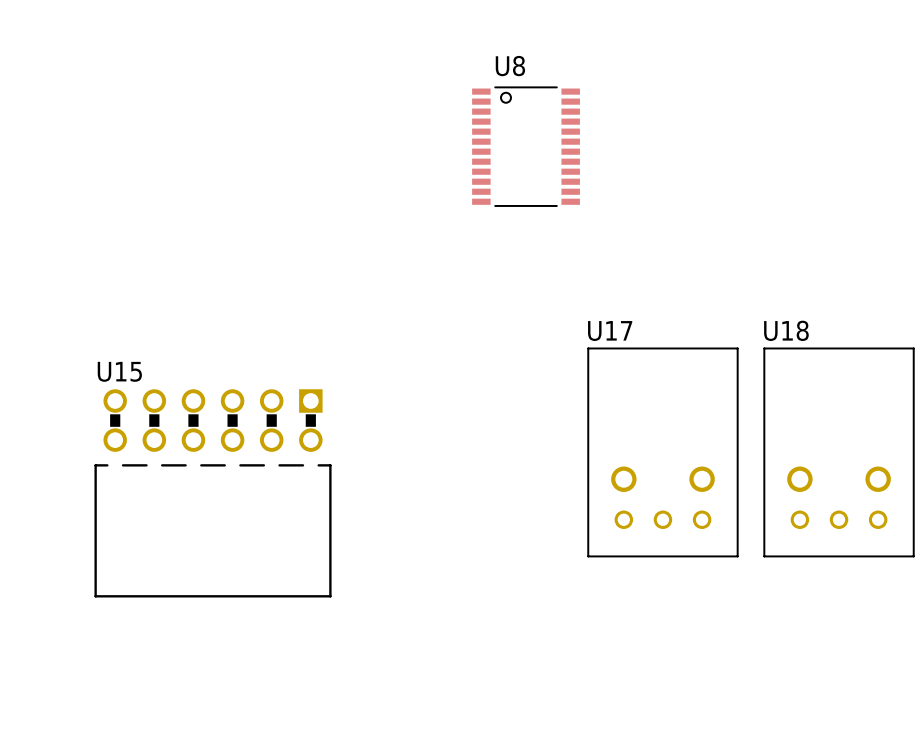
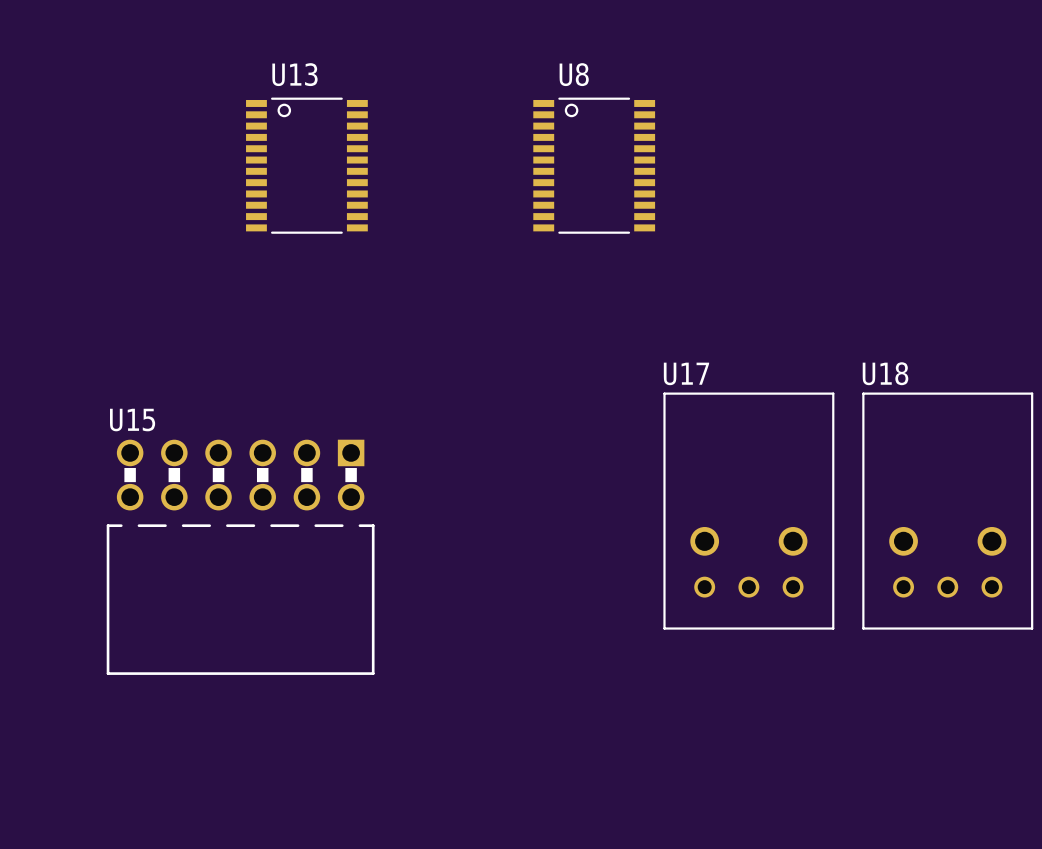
U13: none -> (306, 165)

